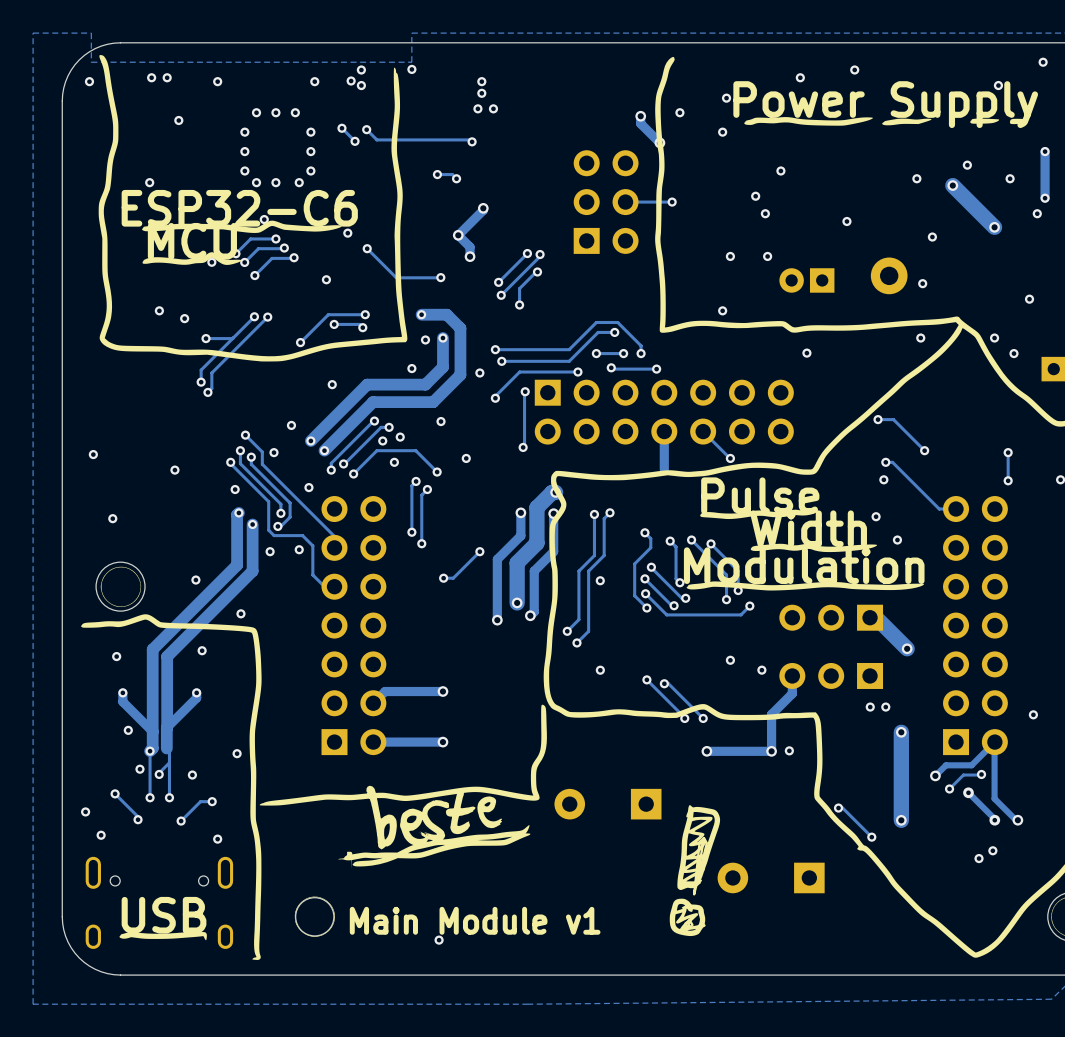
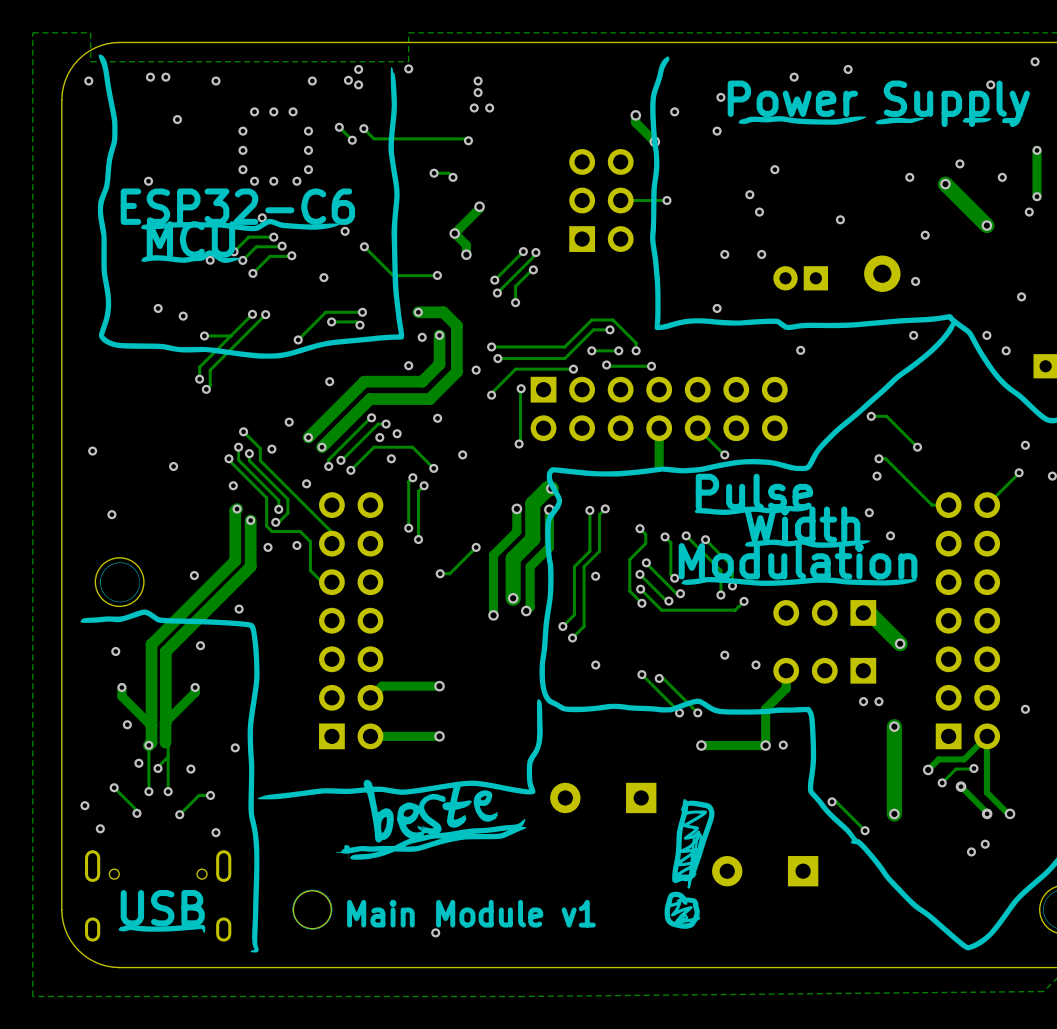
via: none -> (1025, 445)
track: (1008, 452) (1008, 480) -> none
via: (1008, 452) -> none
track: none -> (1019, 472) (987, 505)
via: none -> (1019, 472)
via: (1008, 480) -> none

